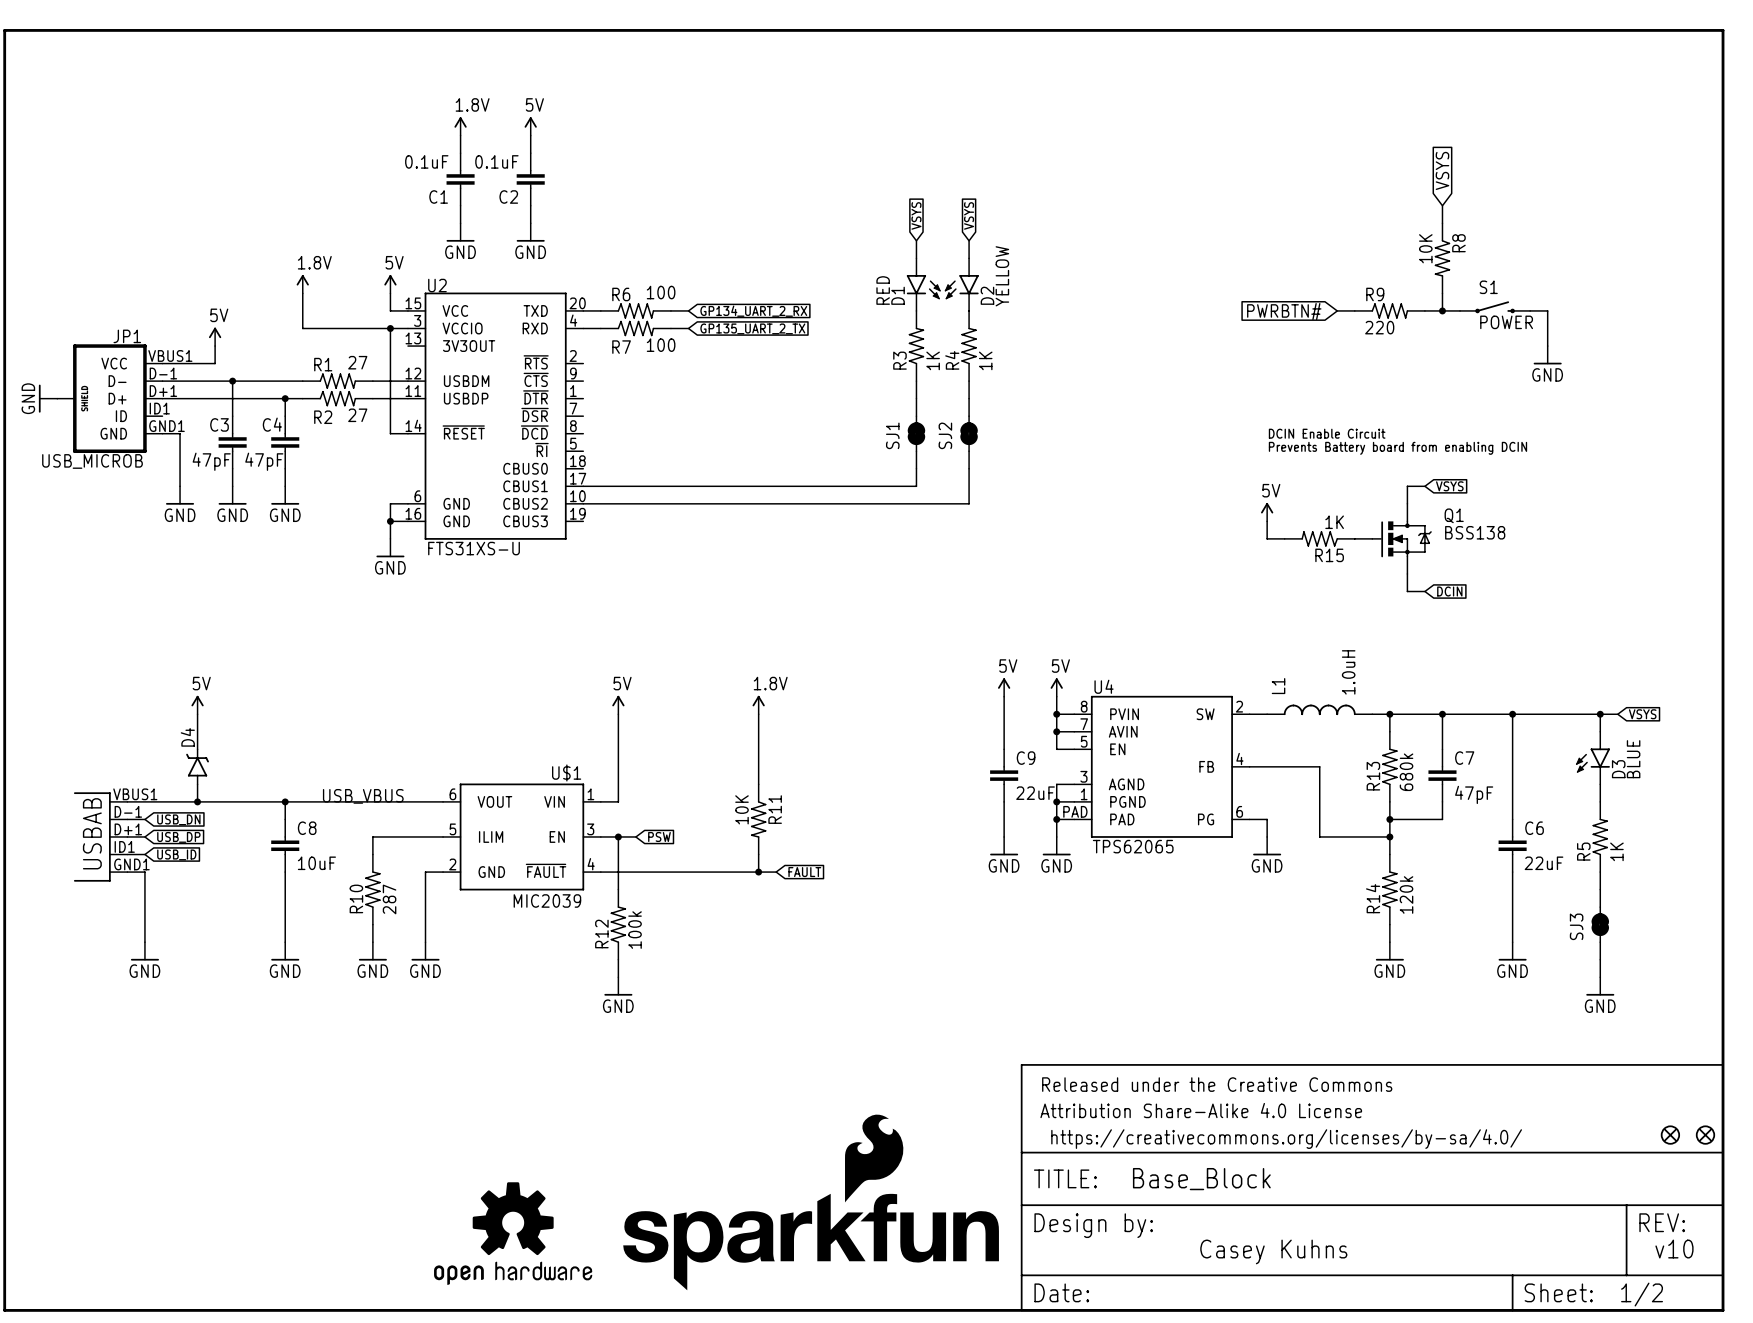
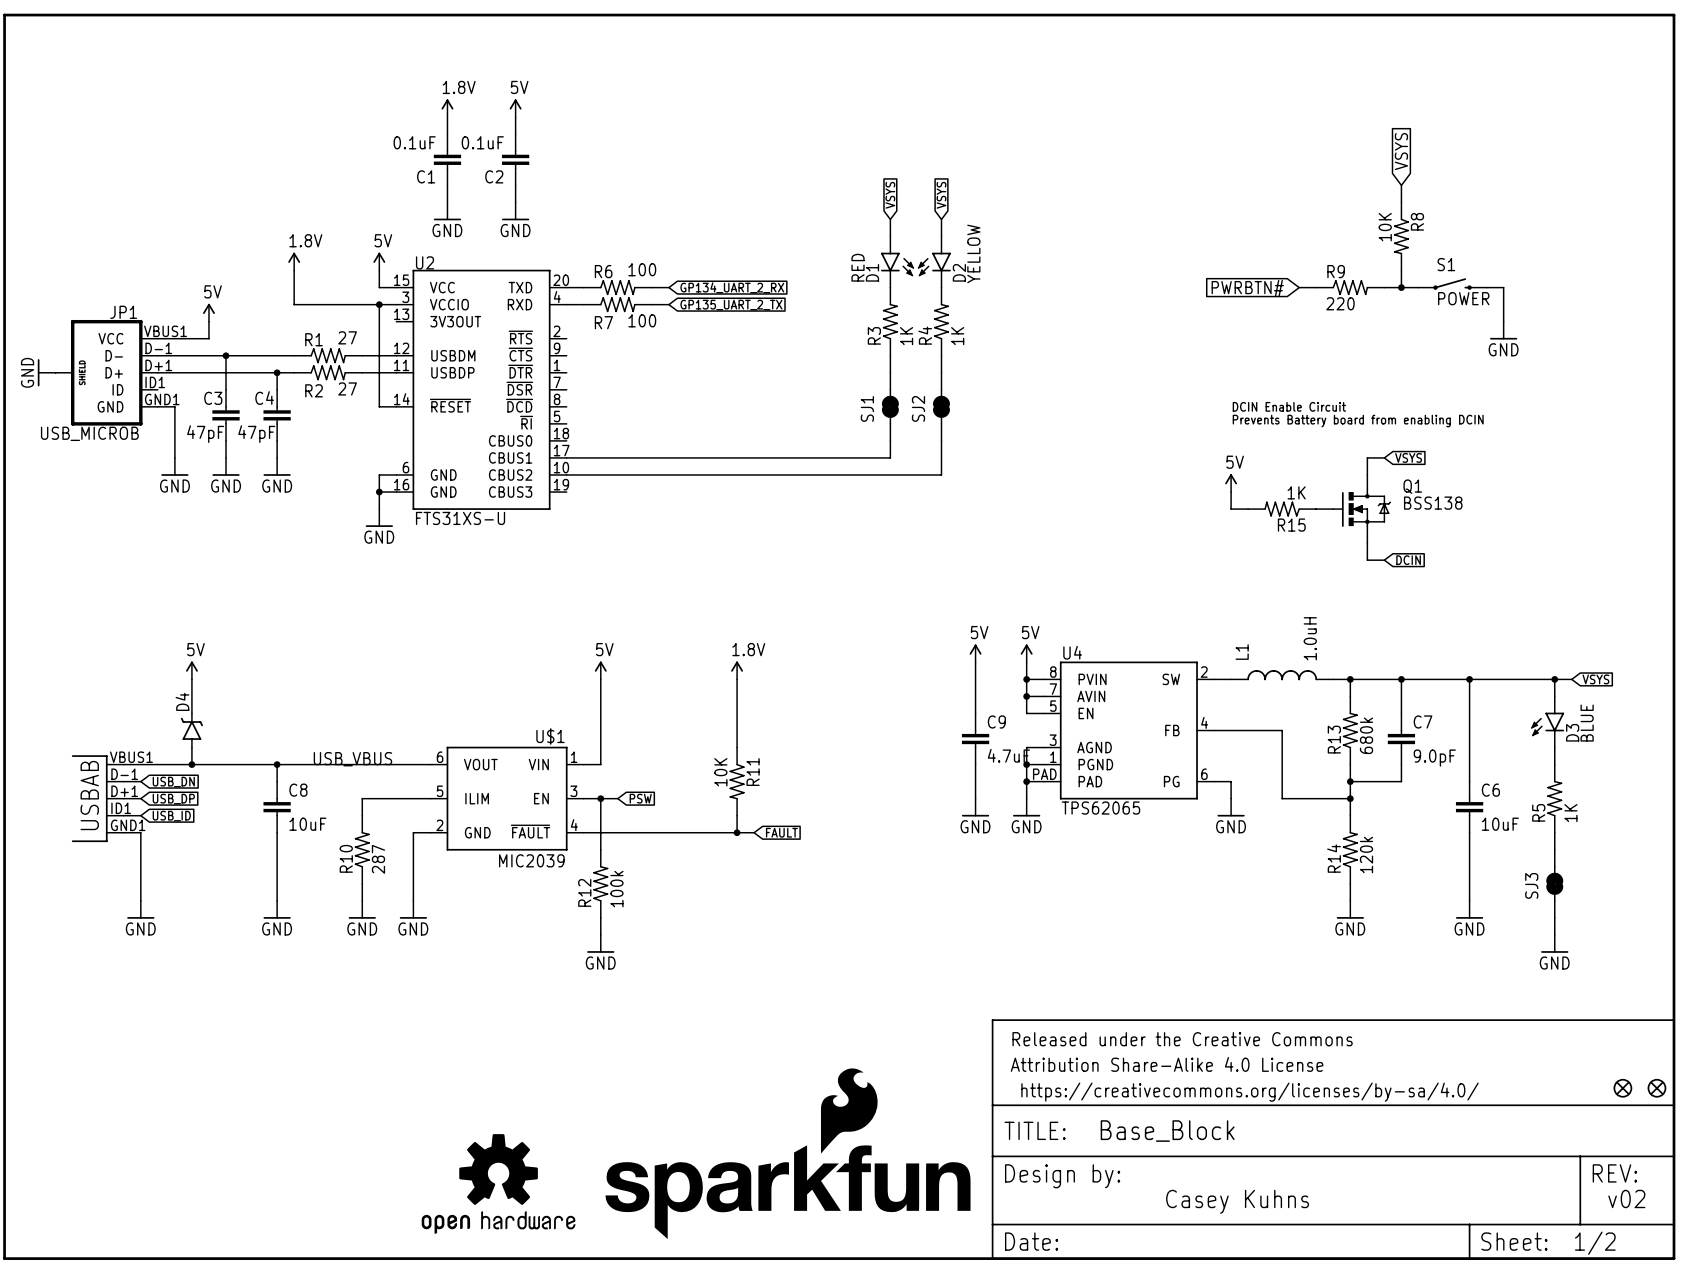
C9 value: 22uF (1035, 793) -> 4.7uF (1008, 755)
C7 value: 47pF (1474, 794) -> 9.0pF (1434, 758)
C6 value: 22uF (1544, 863) -> 10uF (1500, 824)
text: v10 (1674, 1249) -> v02 (1626, 1198)

